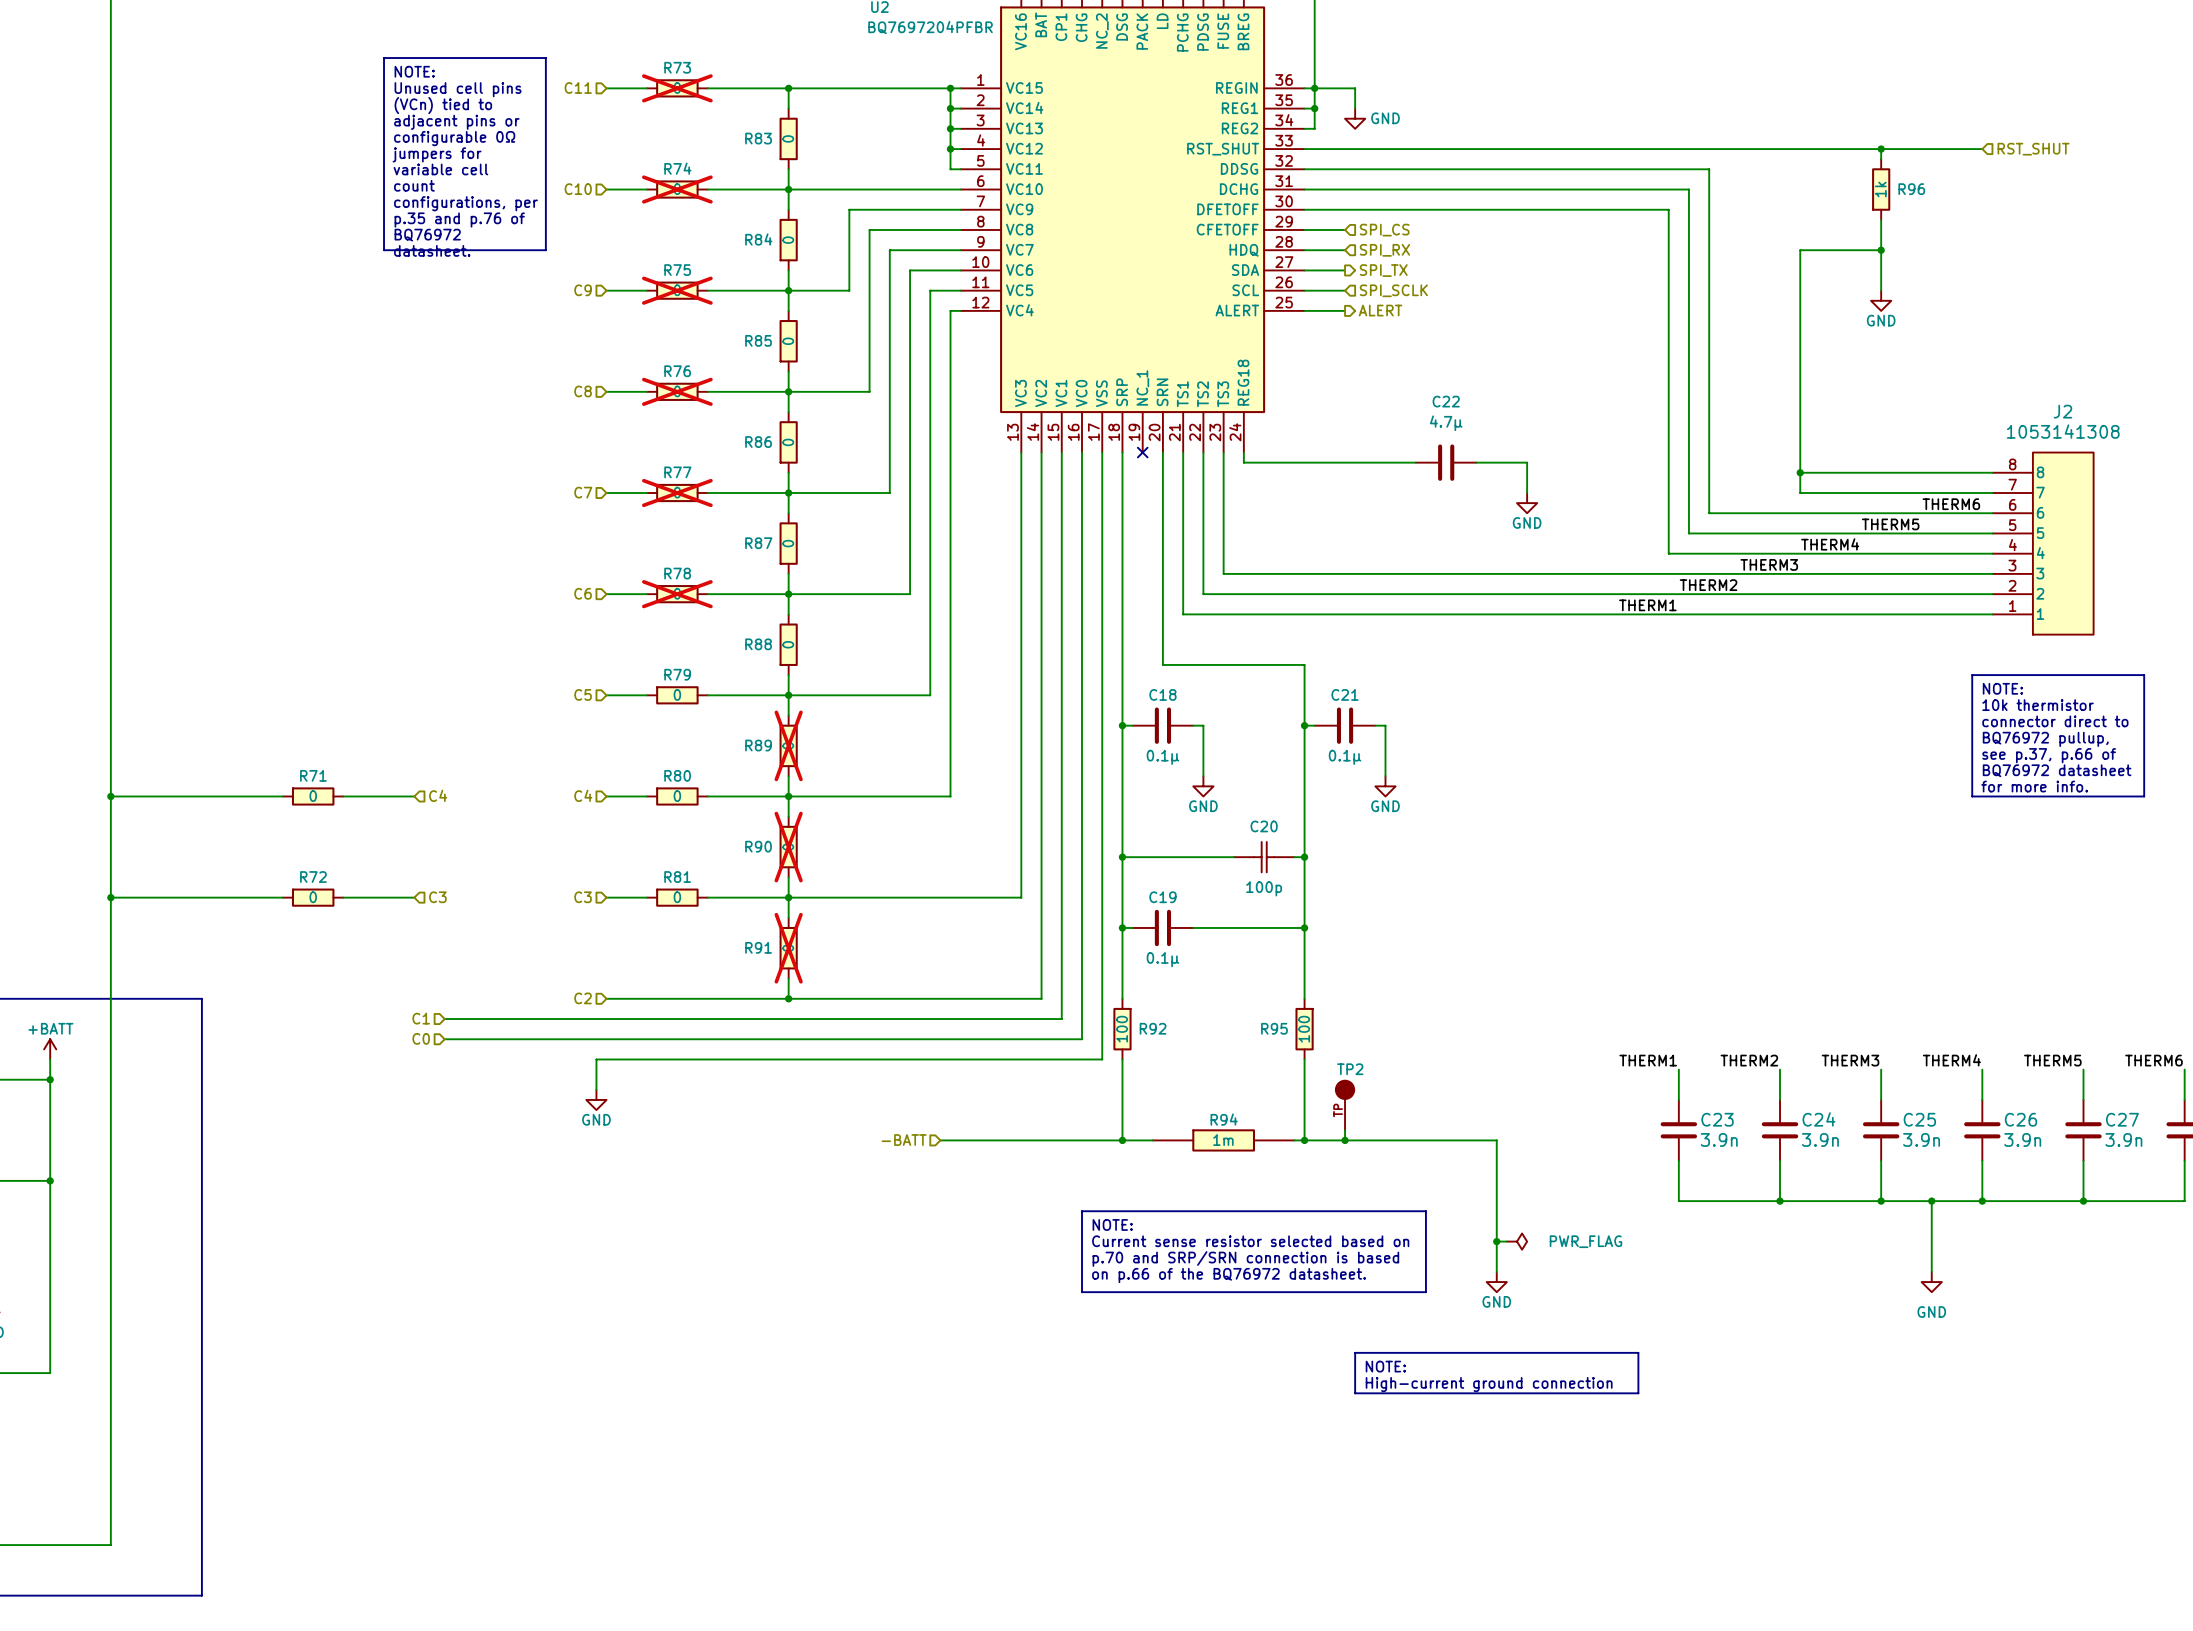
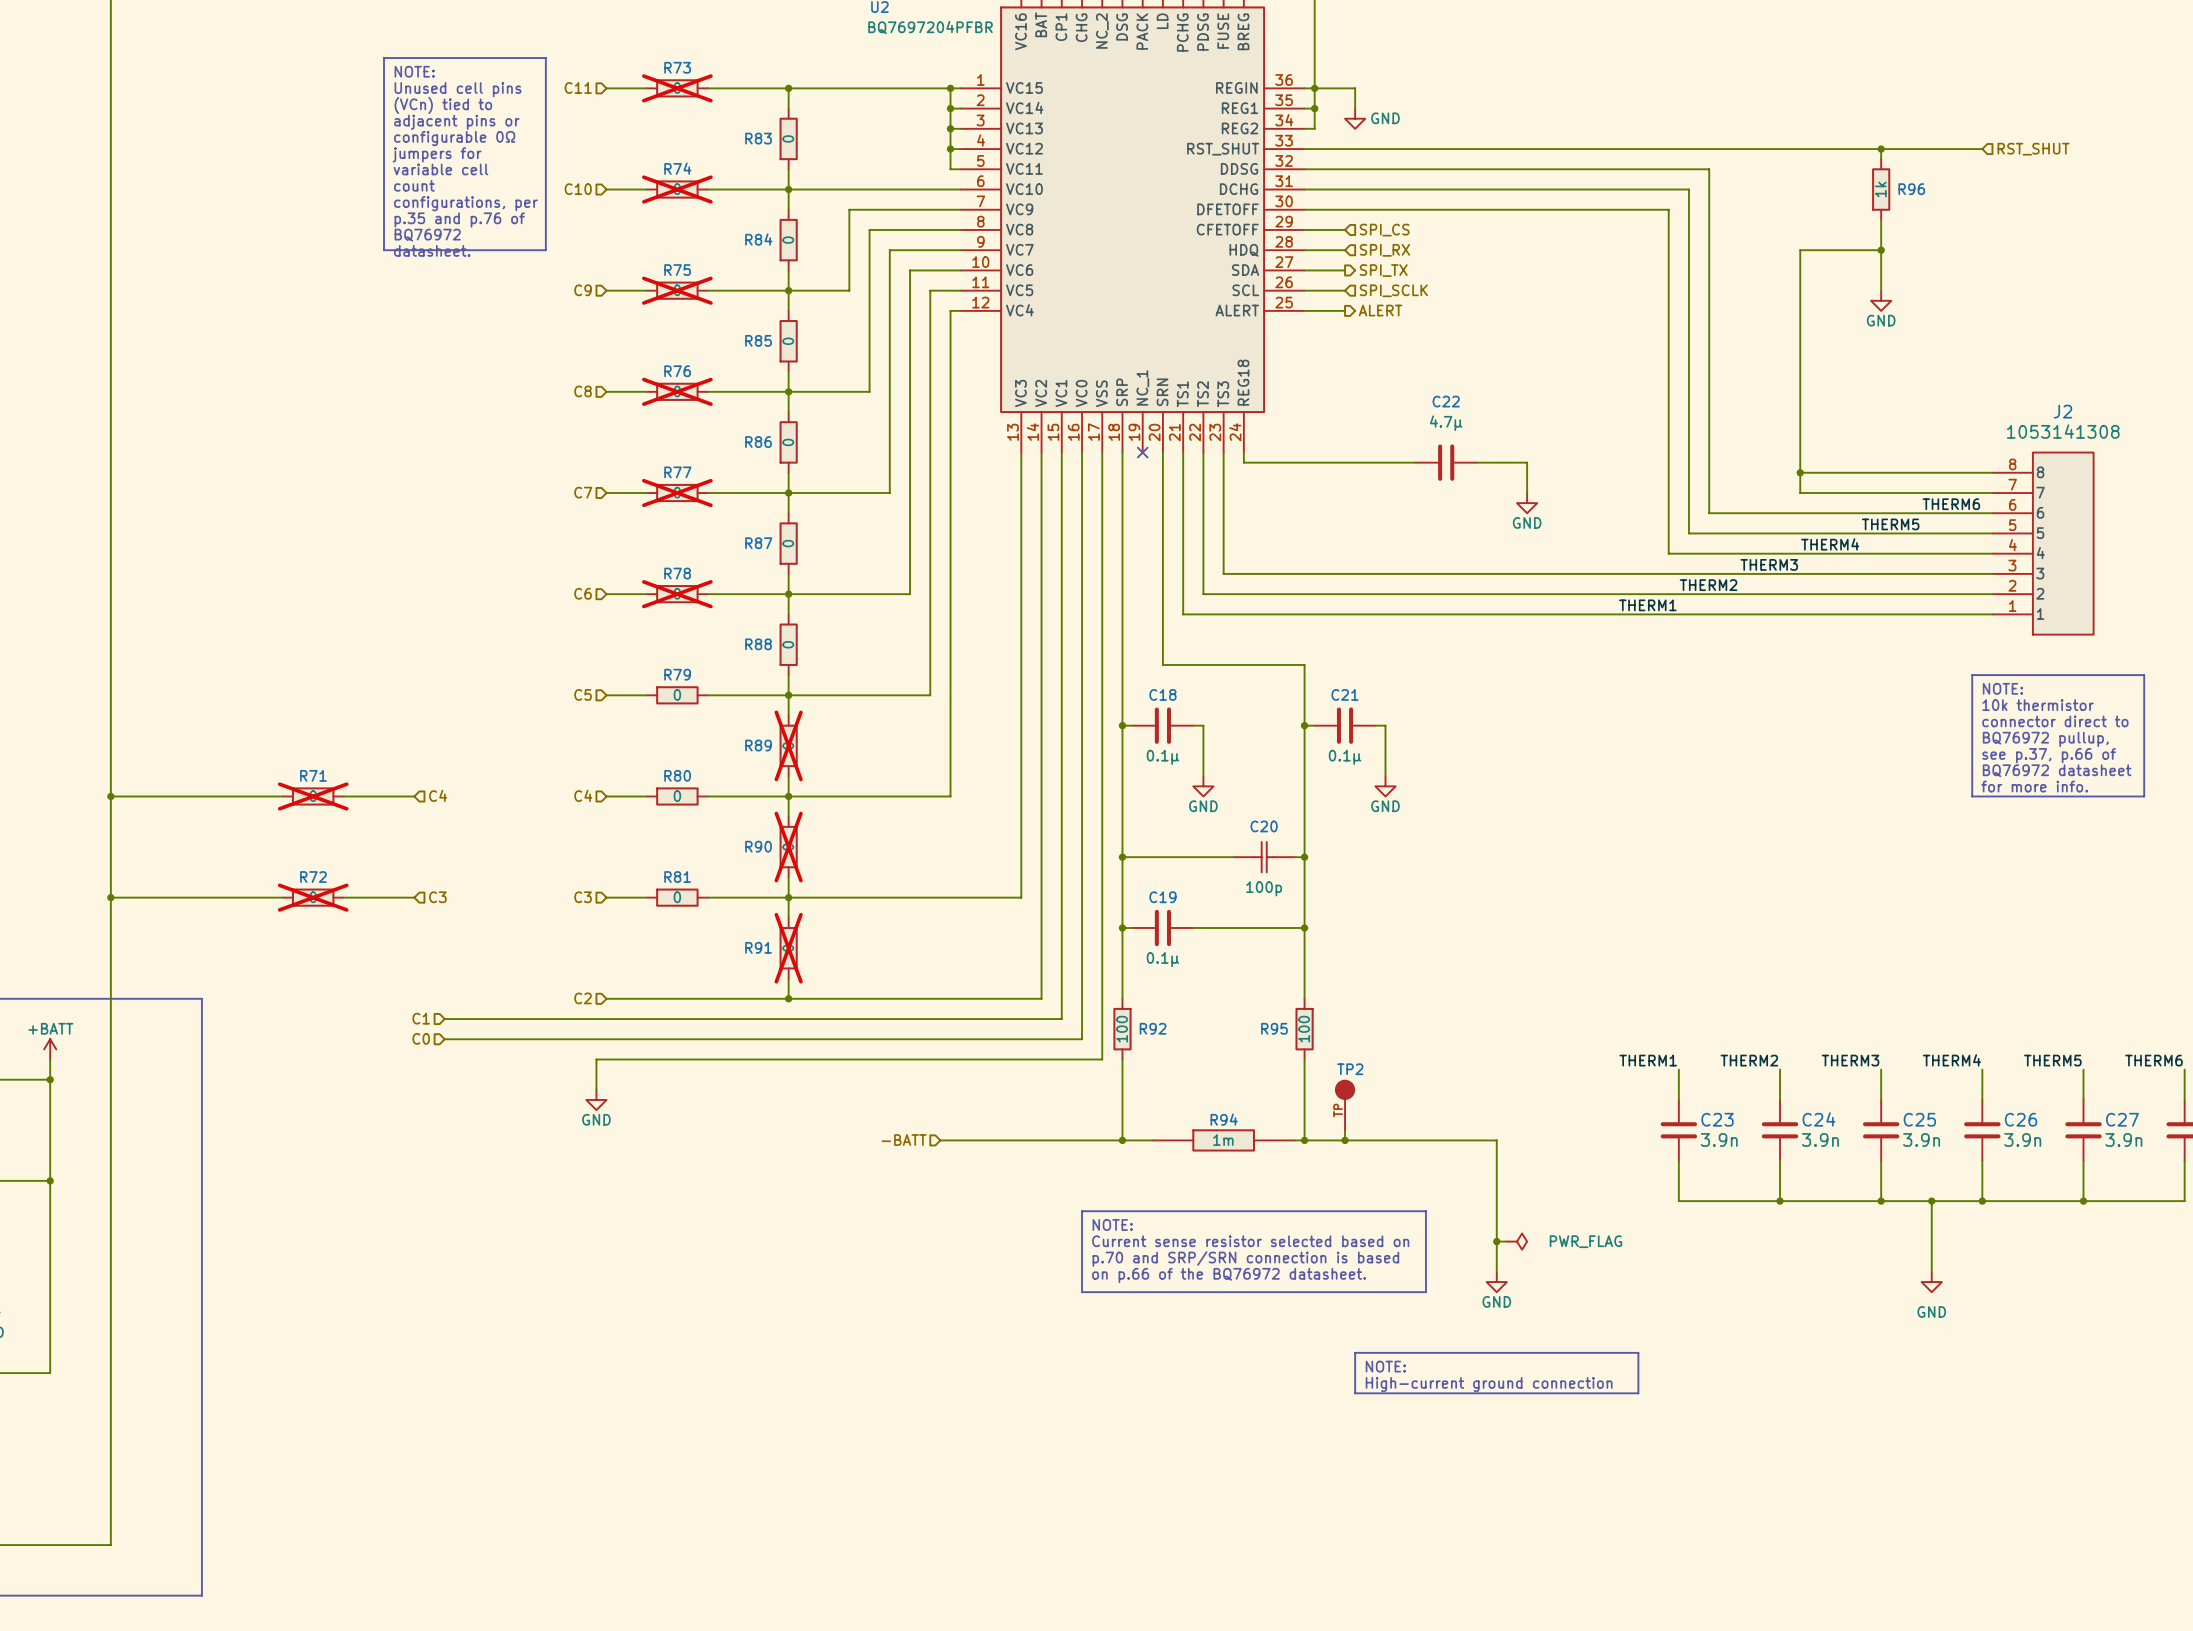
R71 do-not-place cross: none -> (313, 796)
R72 do-not-place cross: none -> (313, 897)

